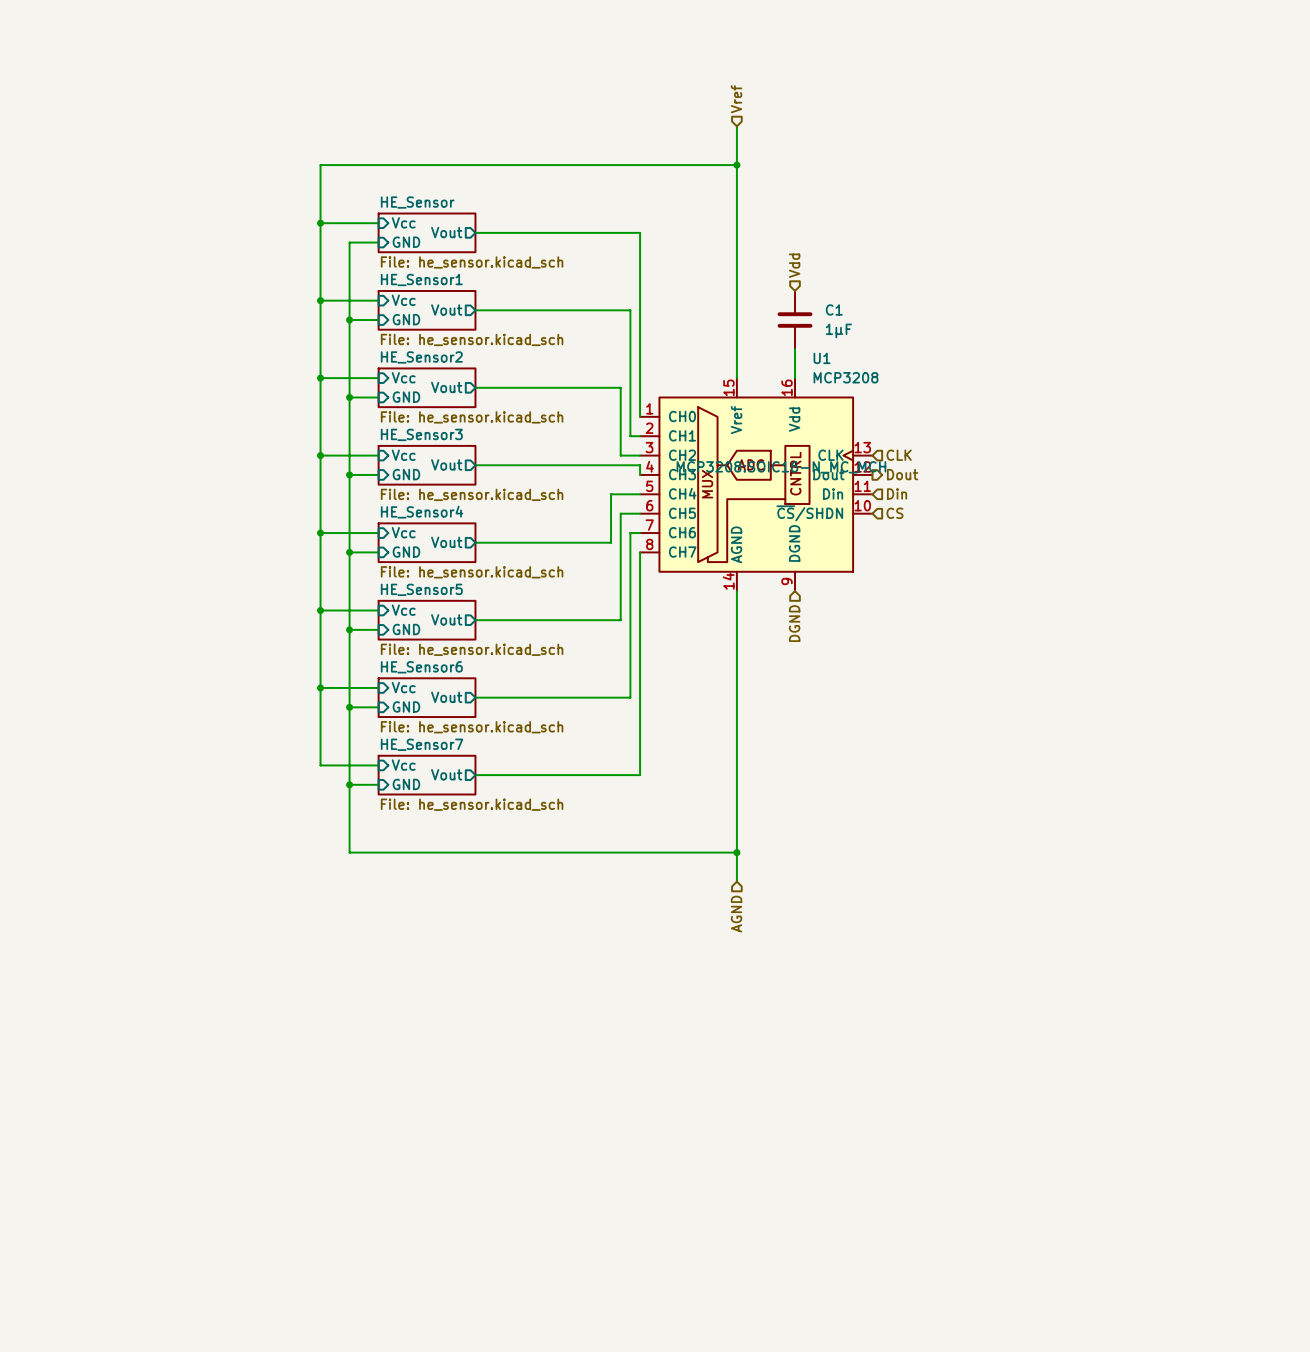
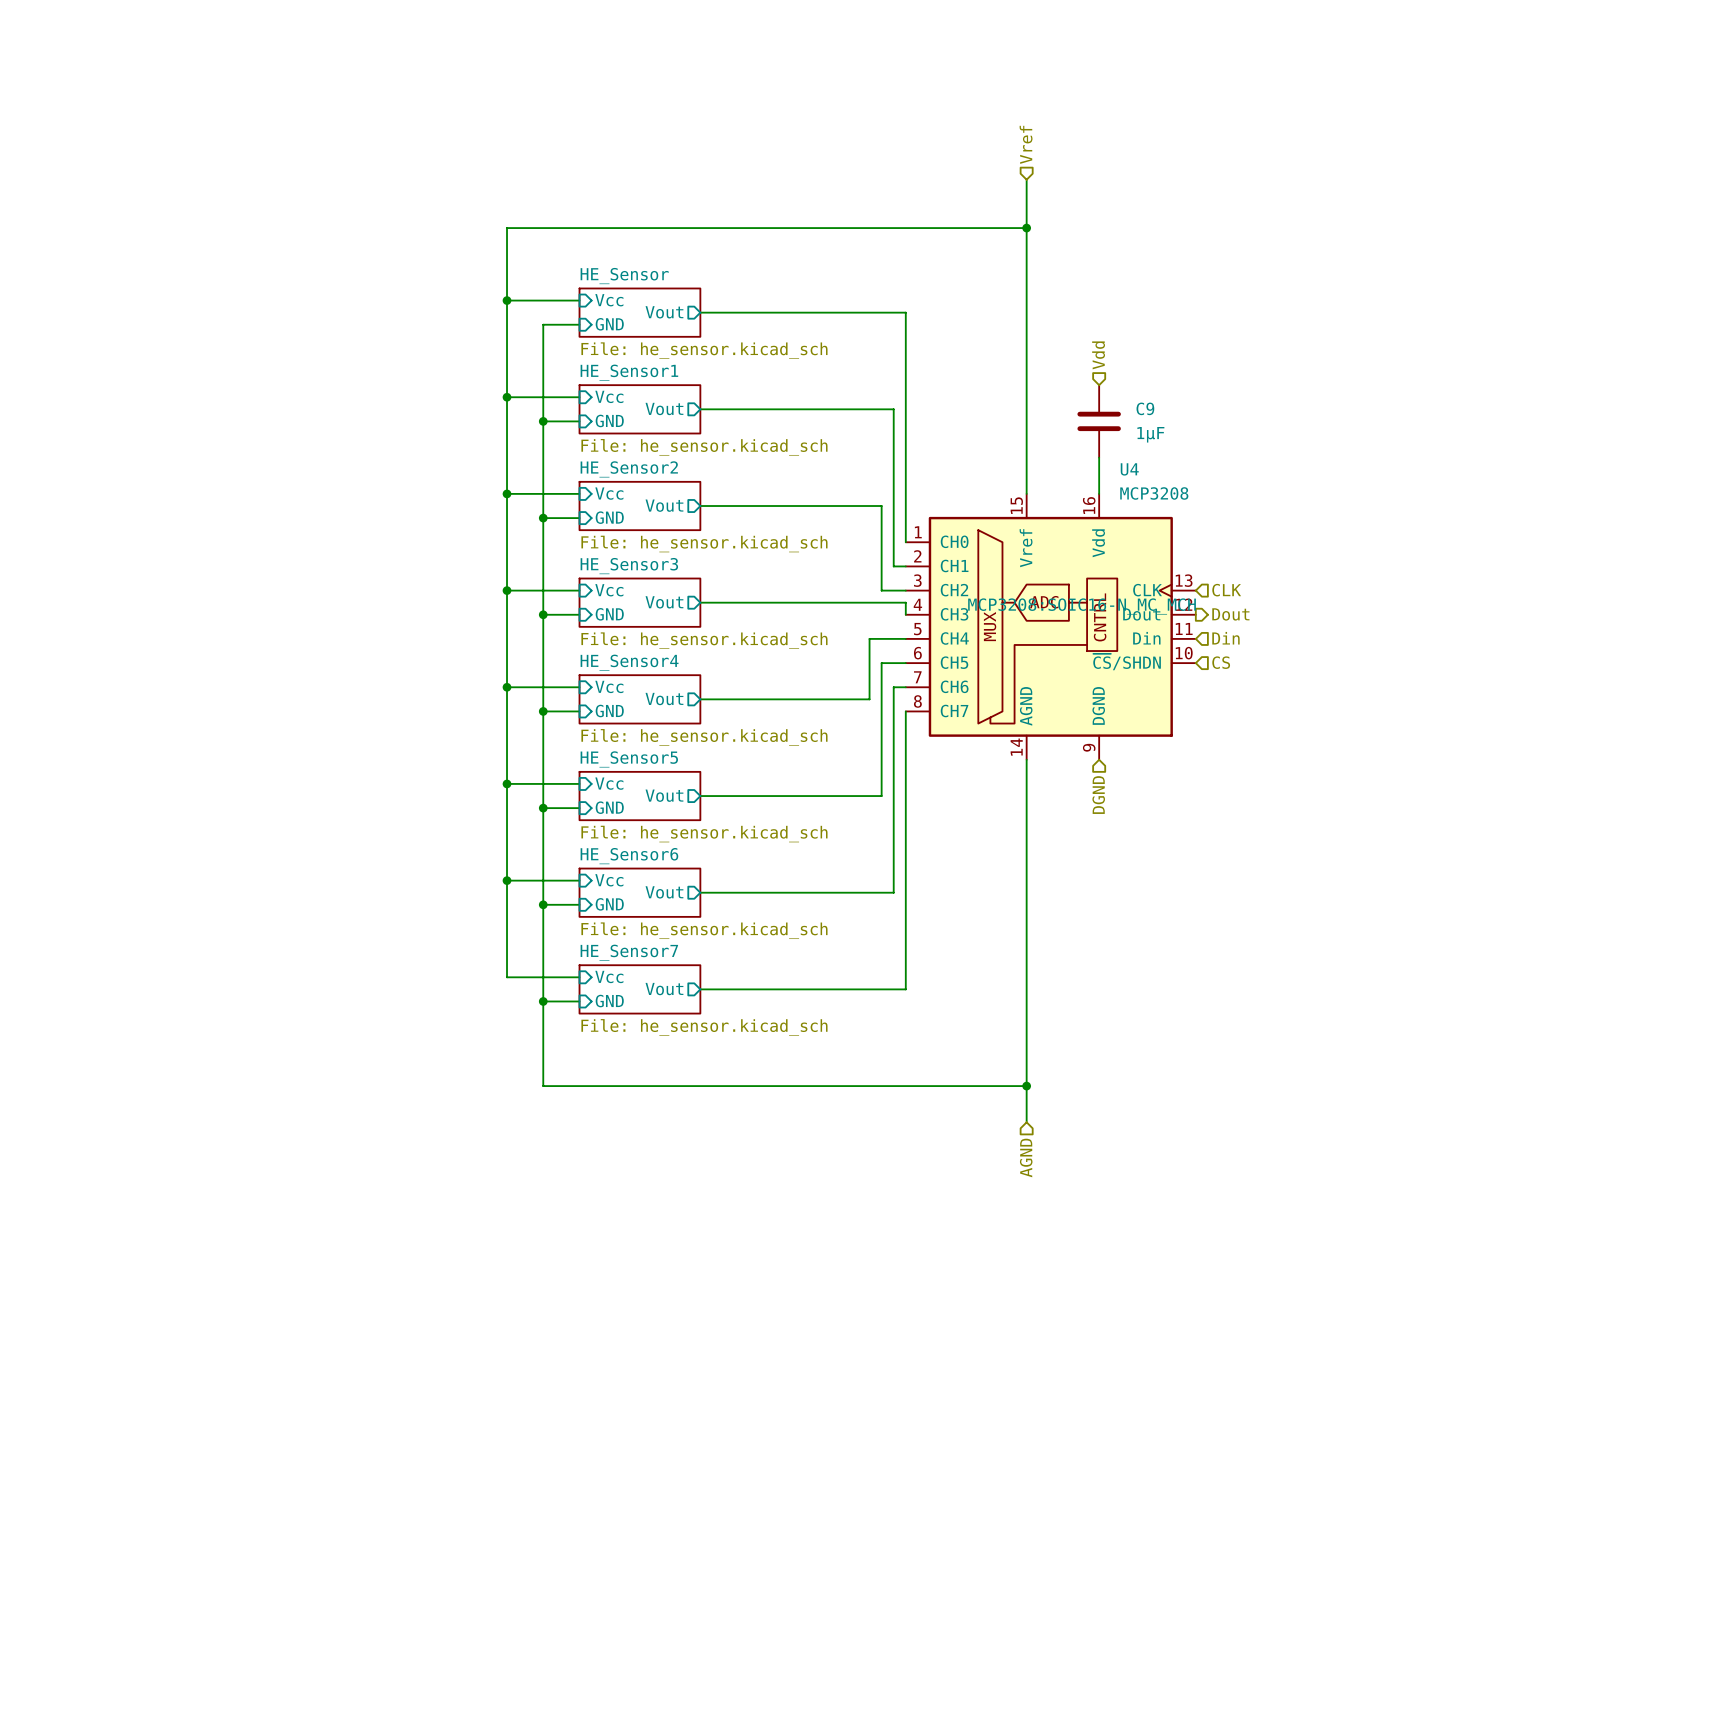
C1 name: C1 (834, 309) -> C9 (1145, 408)
U1 name: U1 (822, 358) -> U4 (1129, 469)

